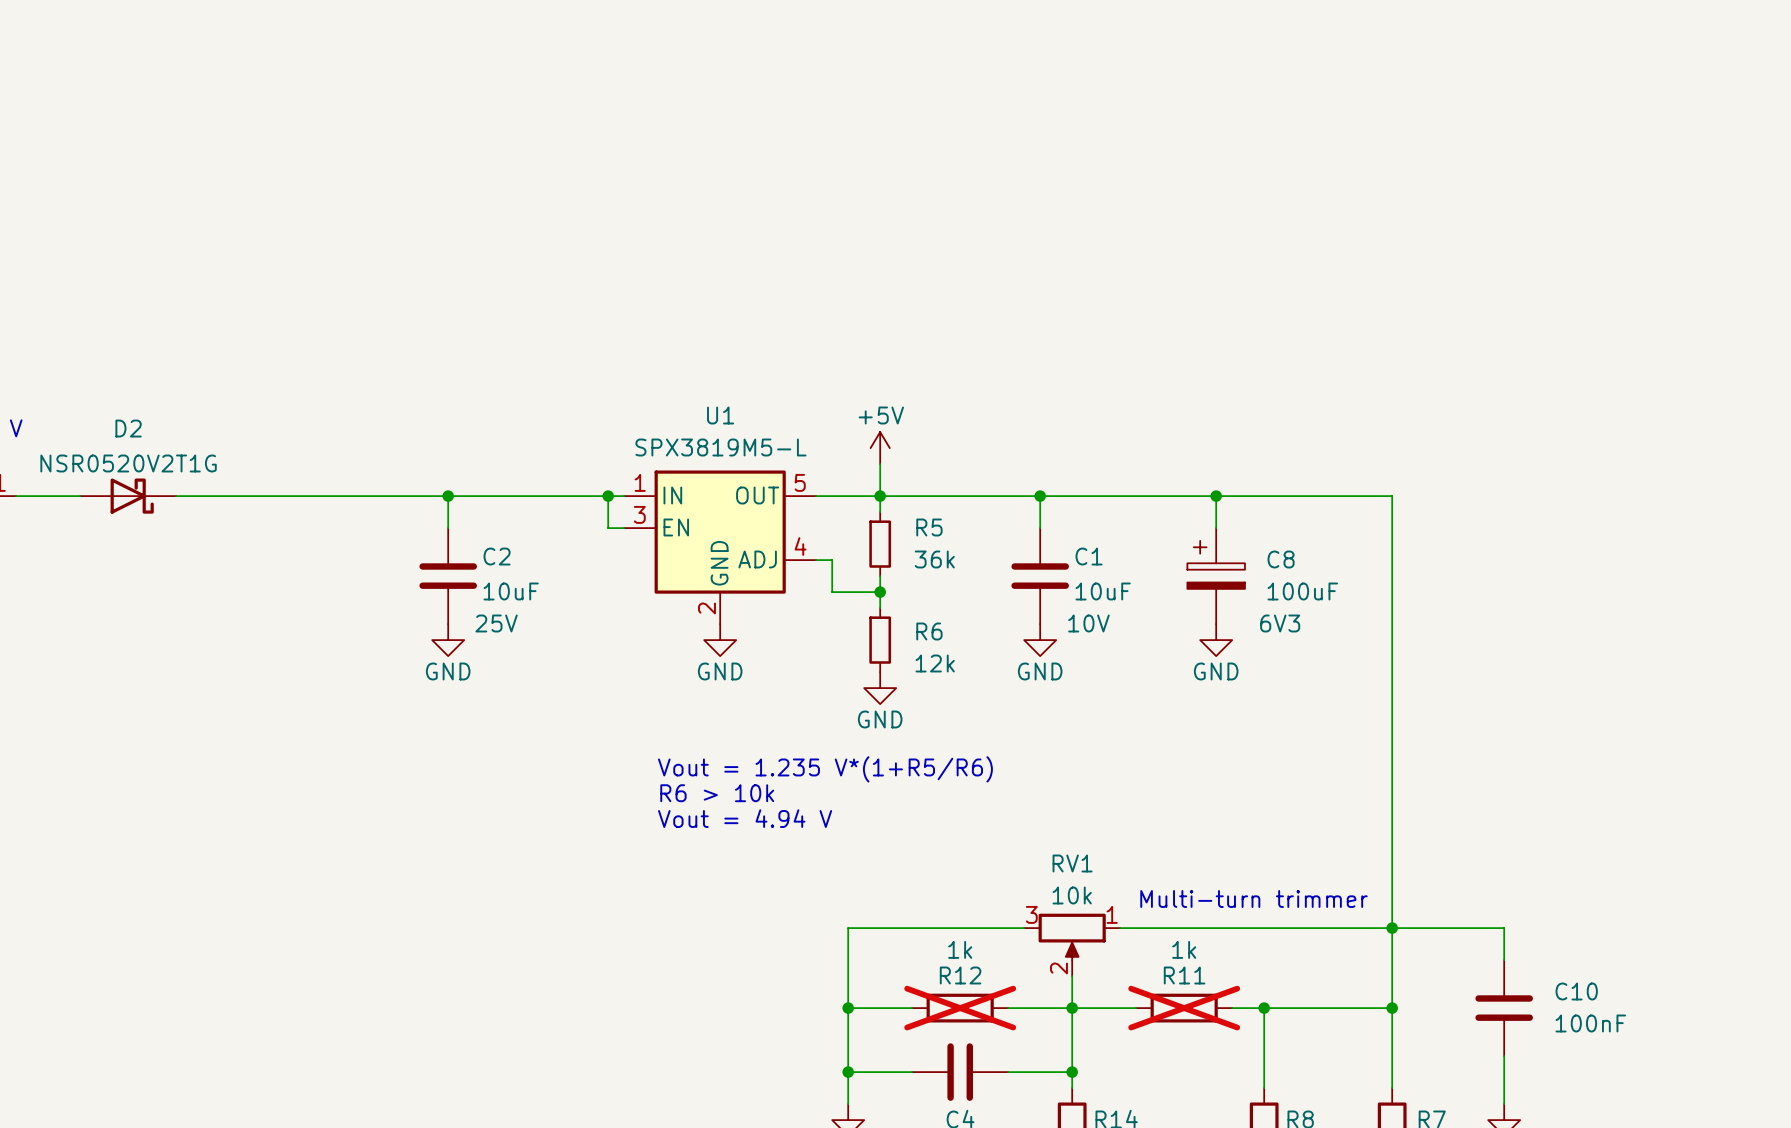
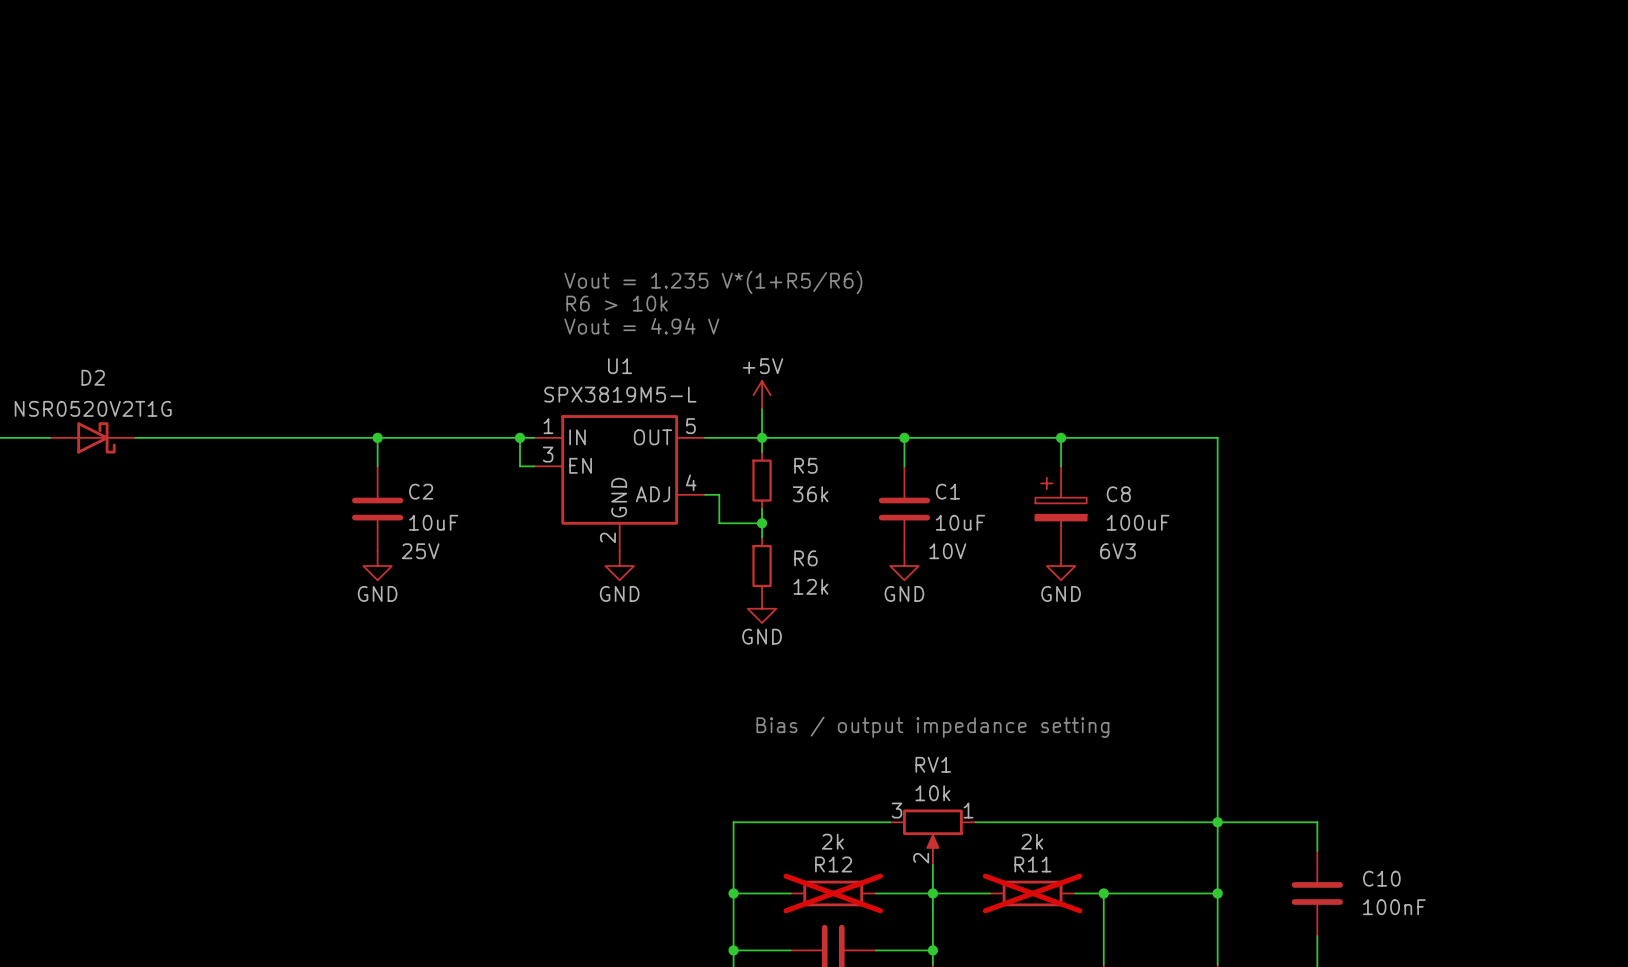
text: none -> Vout = 1.235 V*(1+R5/R6) (713, 282)
text: none -> R6 > 10k (617, 303)
text: none -> Vout = 4.94 V (641, 326)
text: Vout = 1.235 V*(1+R5/R6) (825, 769) -> none
text: R6 > 10k (717, 793) -> none
text: Vout = 4.94 V (745, 818) -> none
text: none -> Bias / output impedance setting (932, 727)
text: Multi-turn trimmer (1254, 898) -> none
R12 value: 1k (960, 949) -> 2k (832, 841)
R11 value: 1k (1184, 949) -> 2k (1032, 841)

